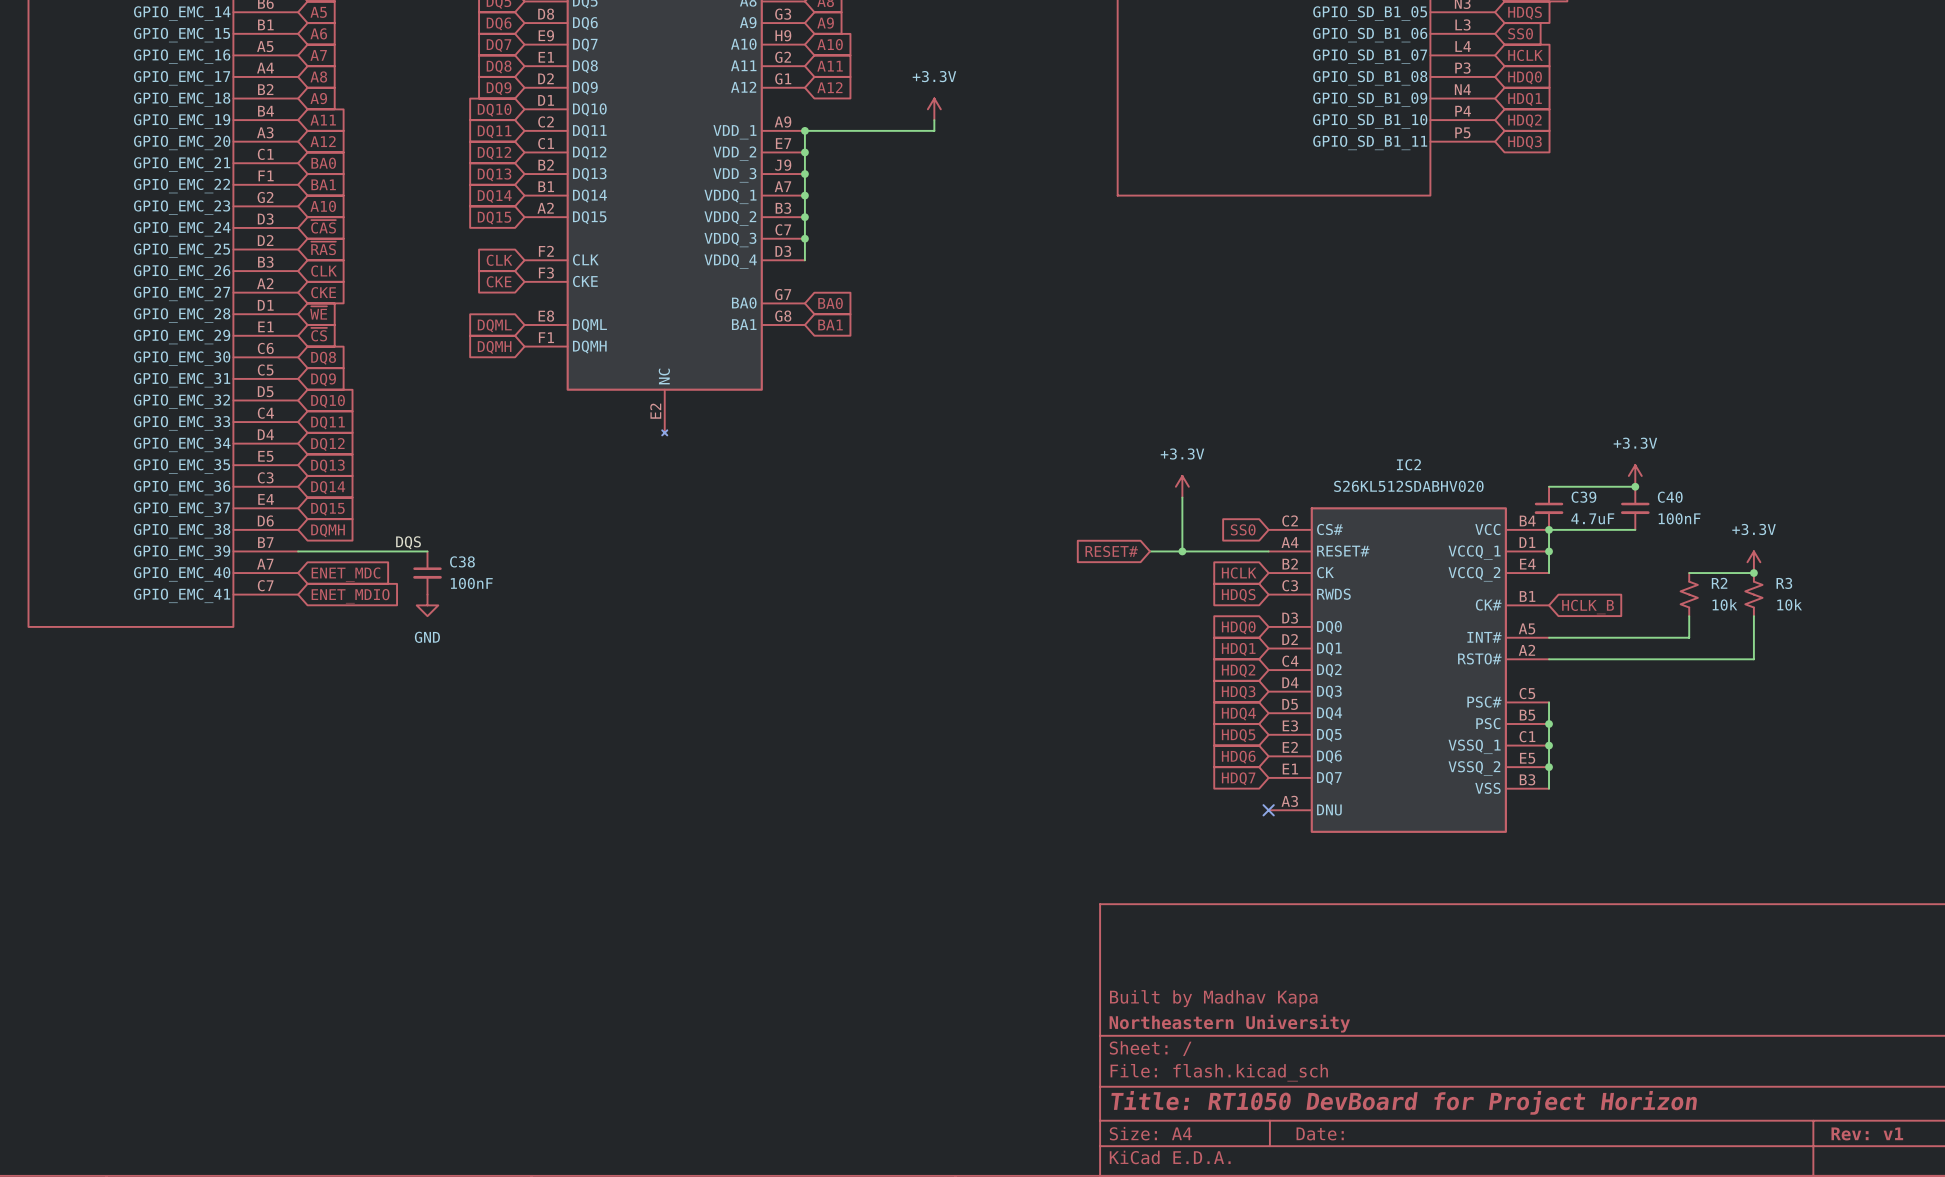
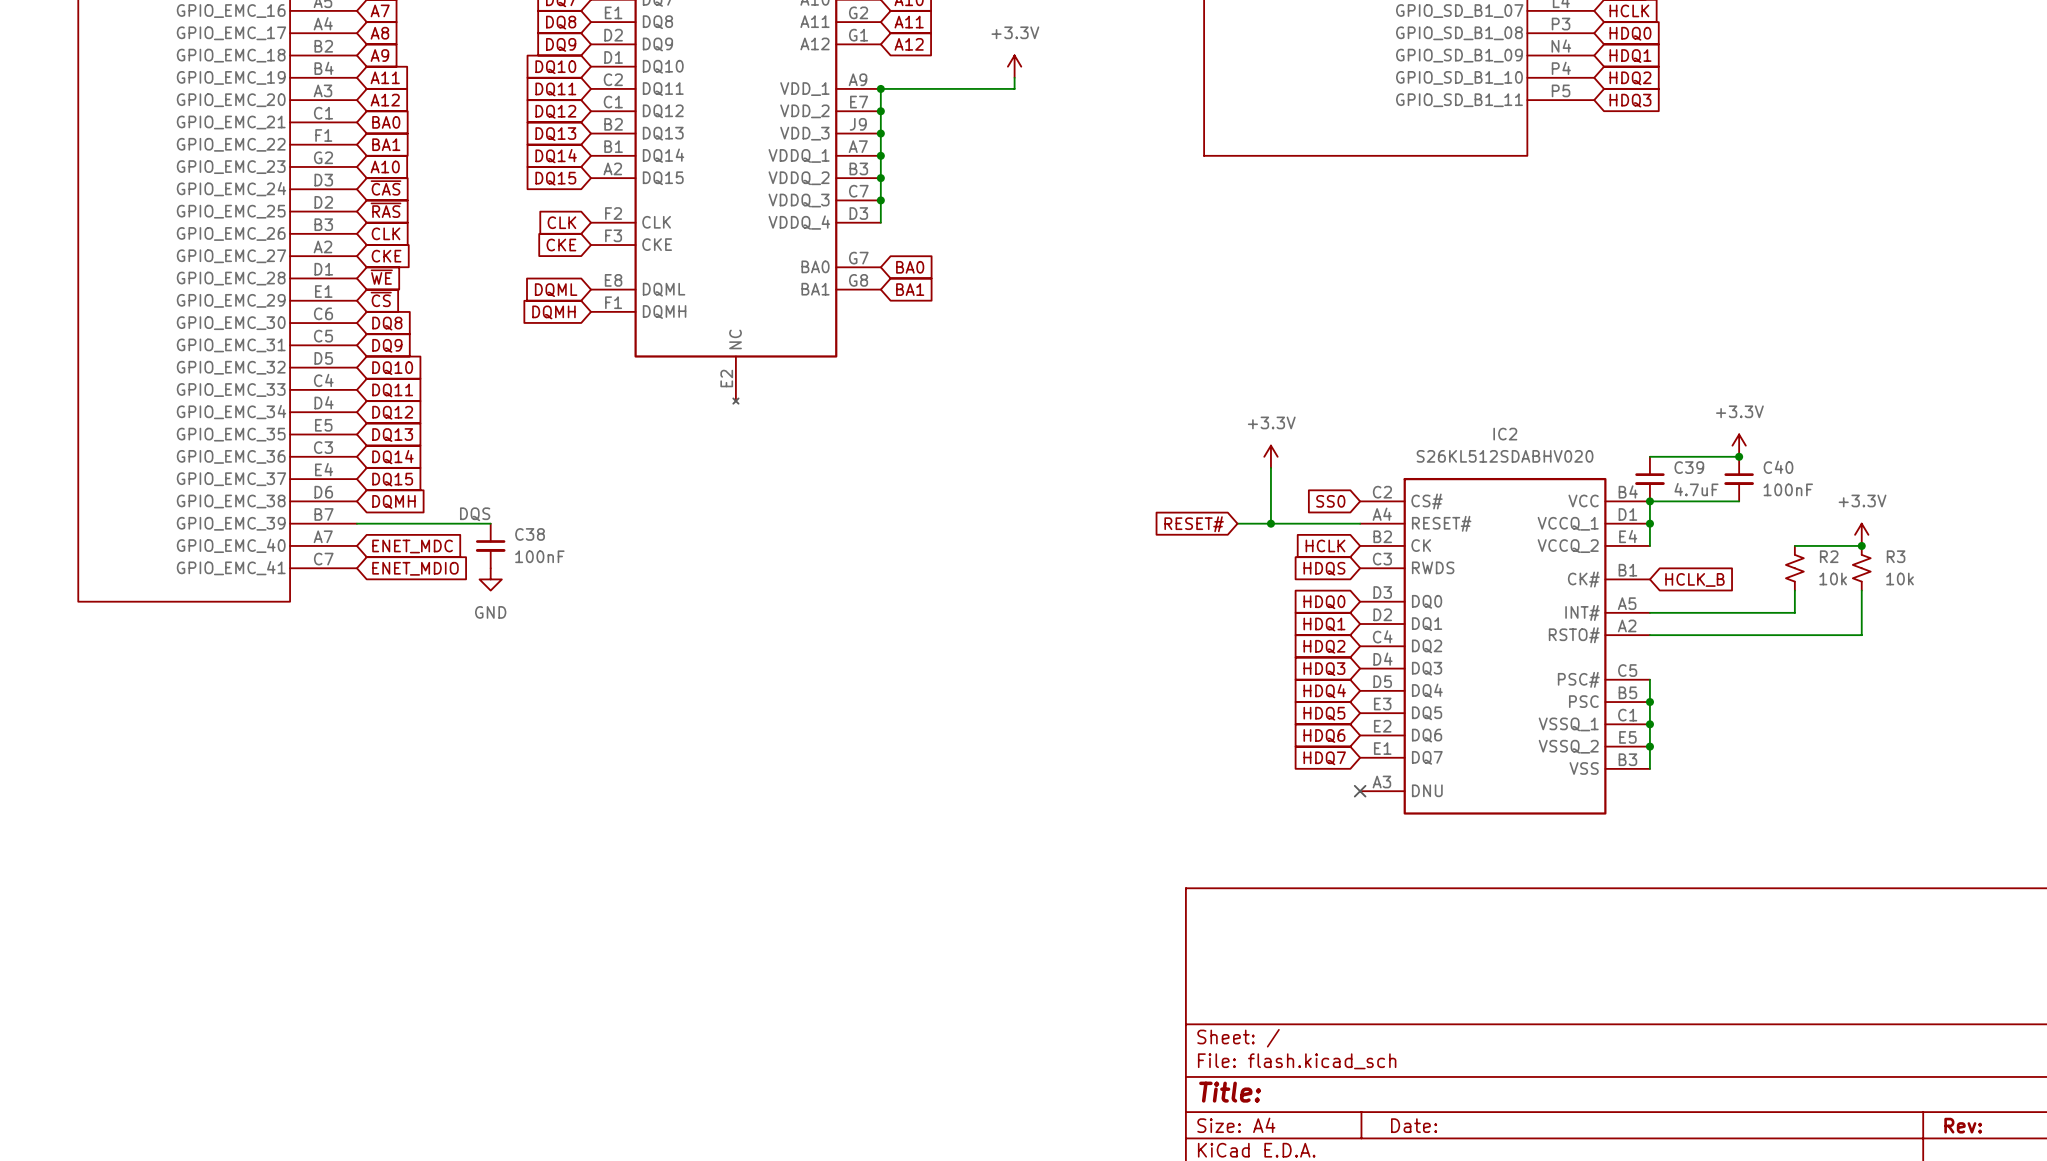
title block: Built by Madhav Kapa (1213, 998) -> none
title block: Northeastern University (1229, 1023) -> none
title block: Title: RT1050 DevBoard for Project Horizon (1404, 1102) -> Title: (1230, 1092)
title block: Rev: v1 (1867, 1133) -> Rev: (1963, 1125)

